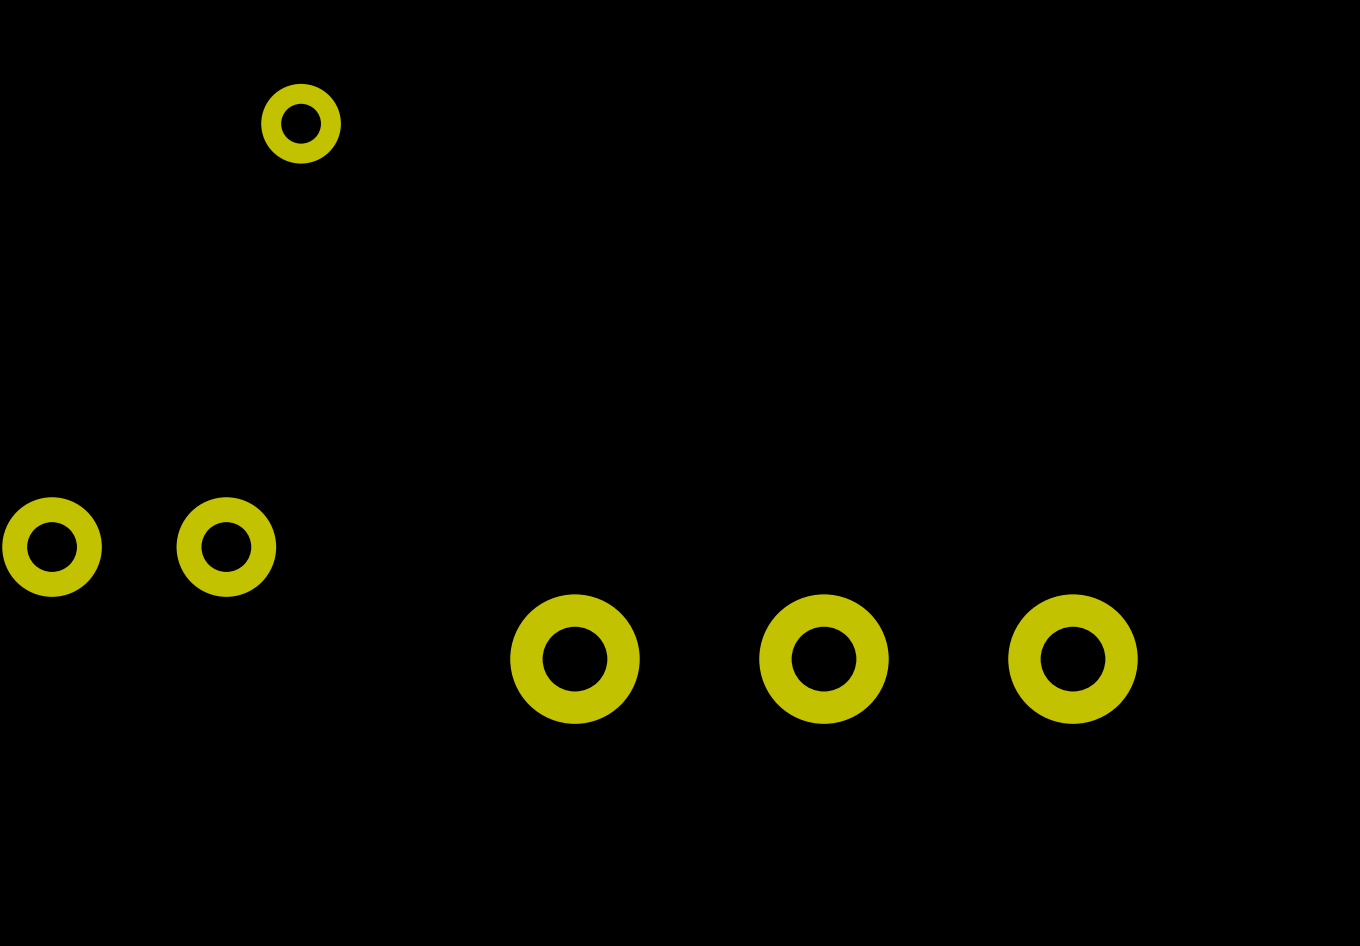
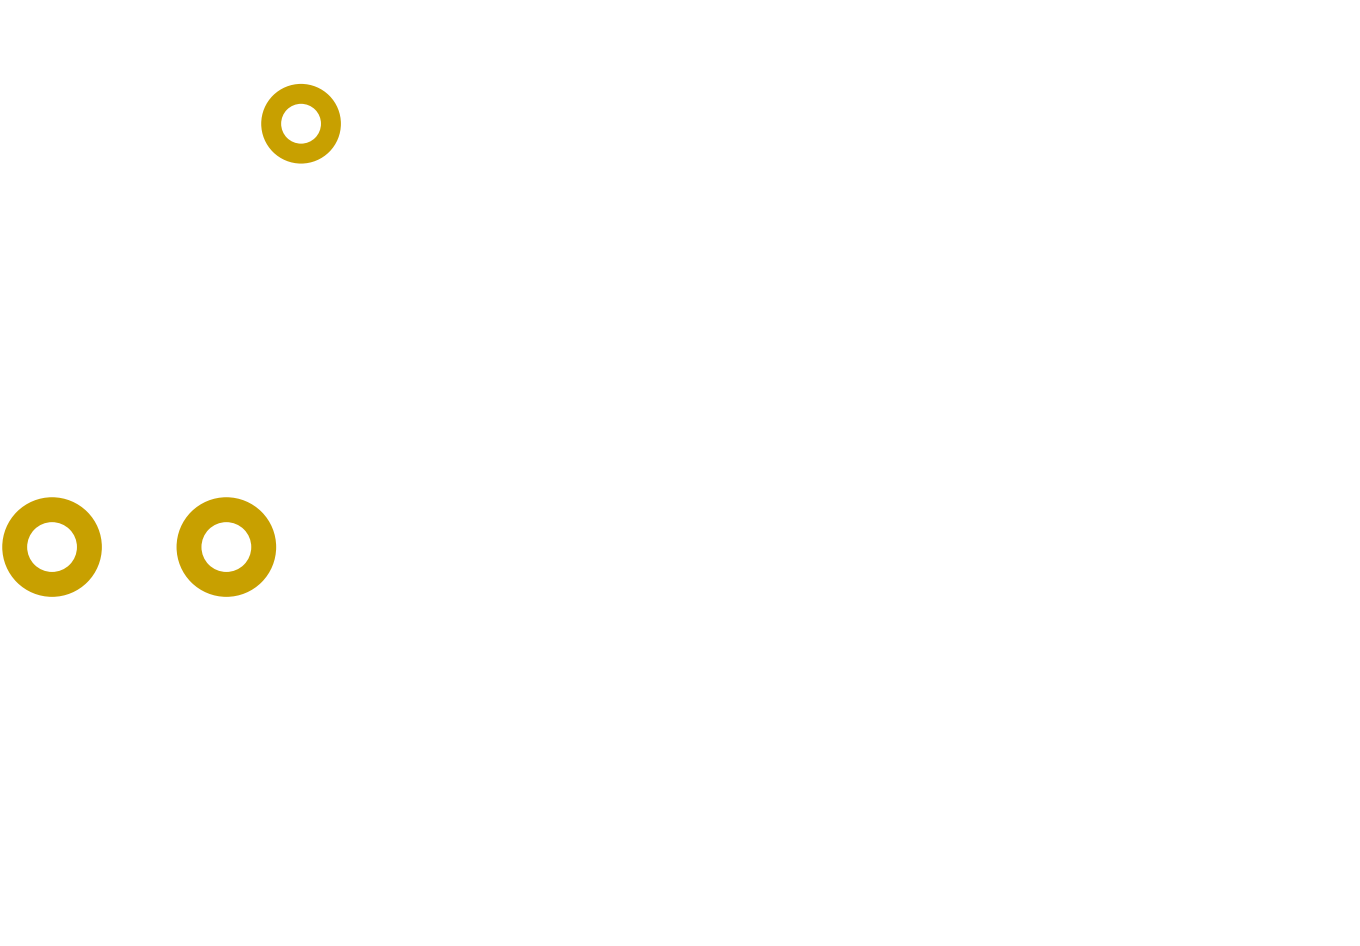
part: (823, 659) -> none

